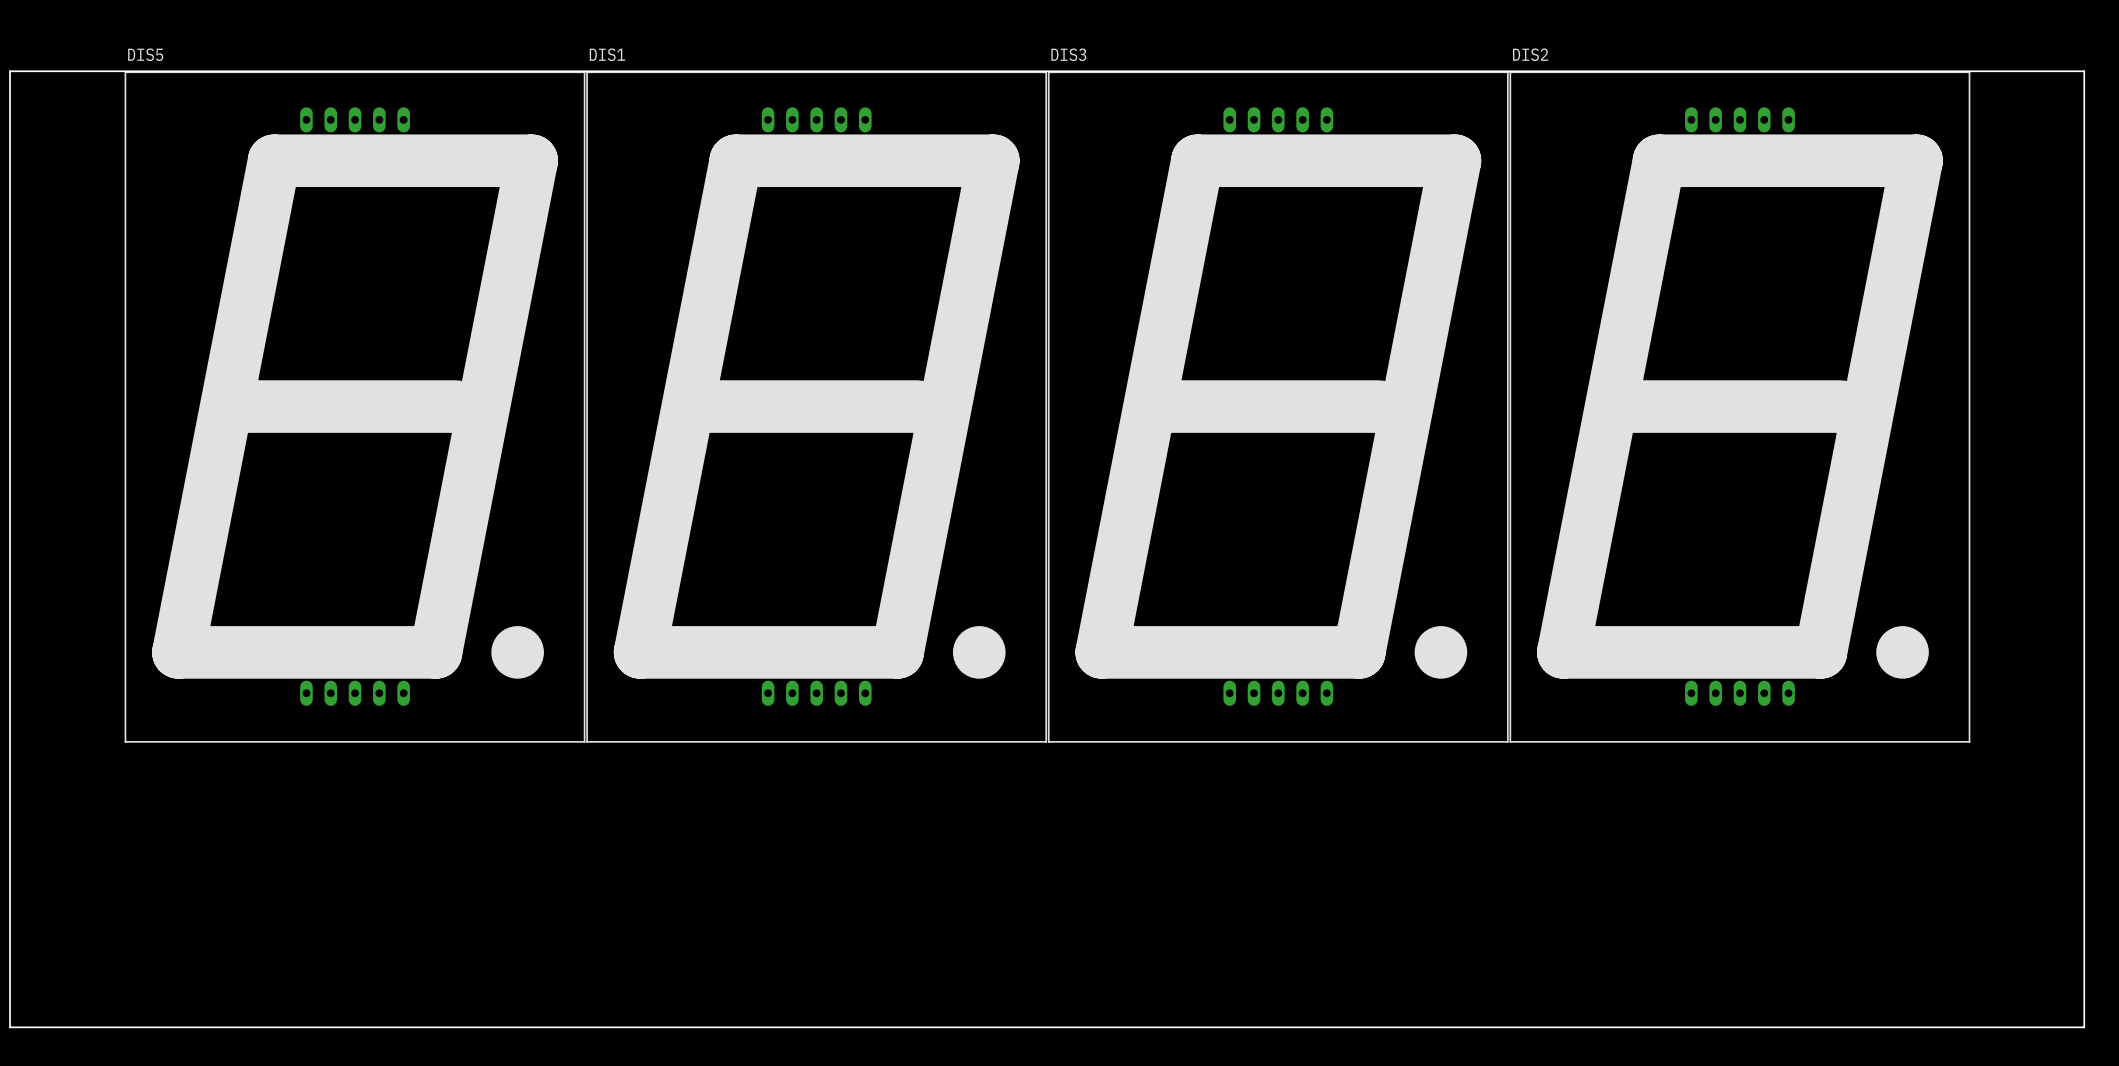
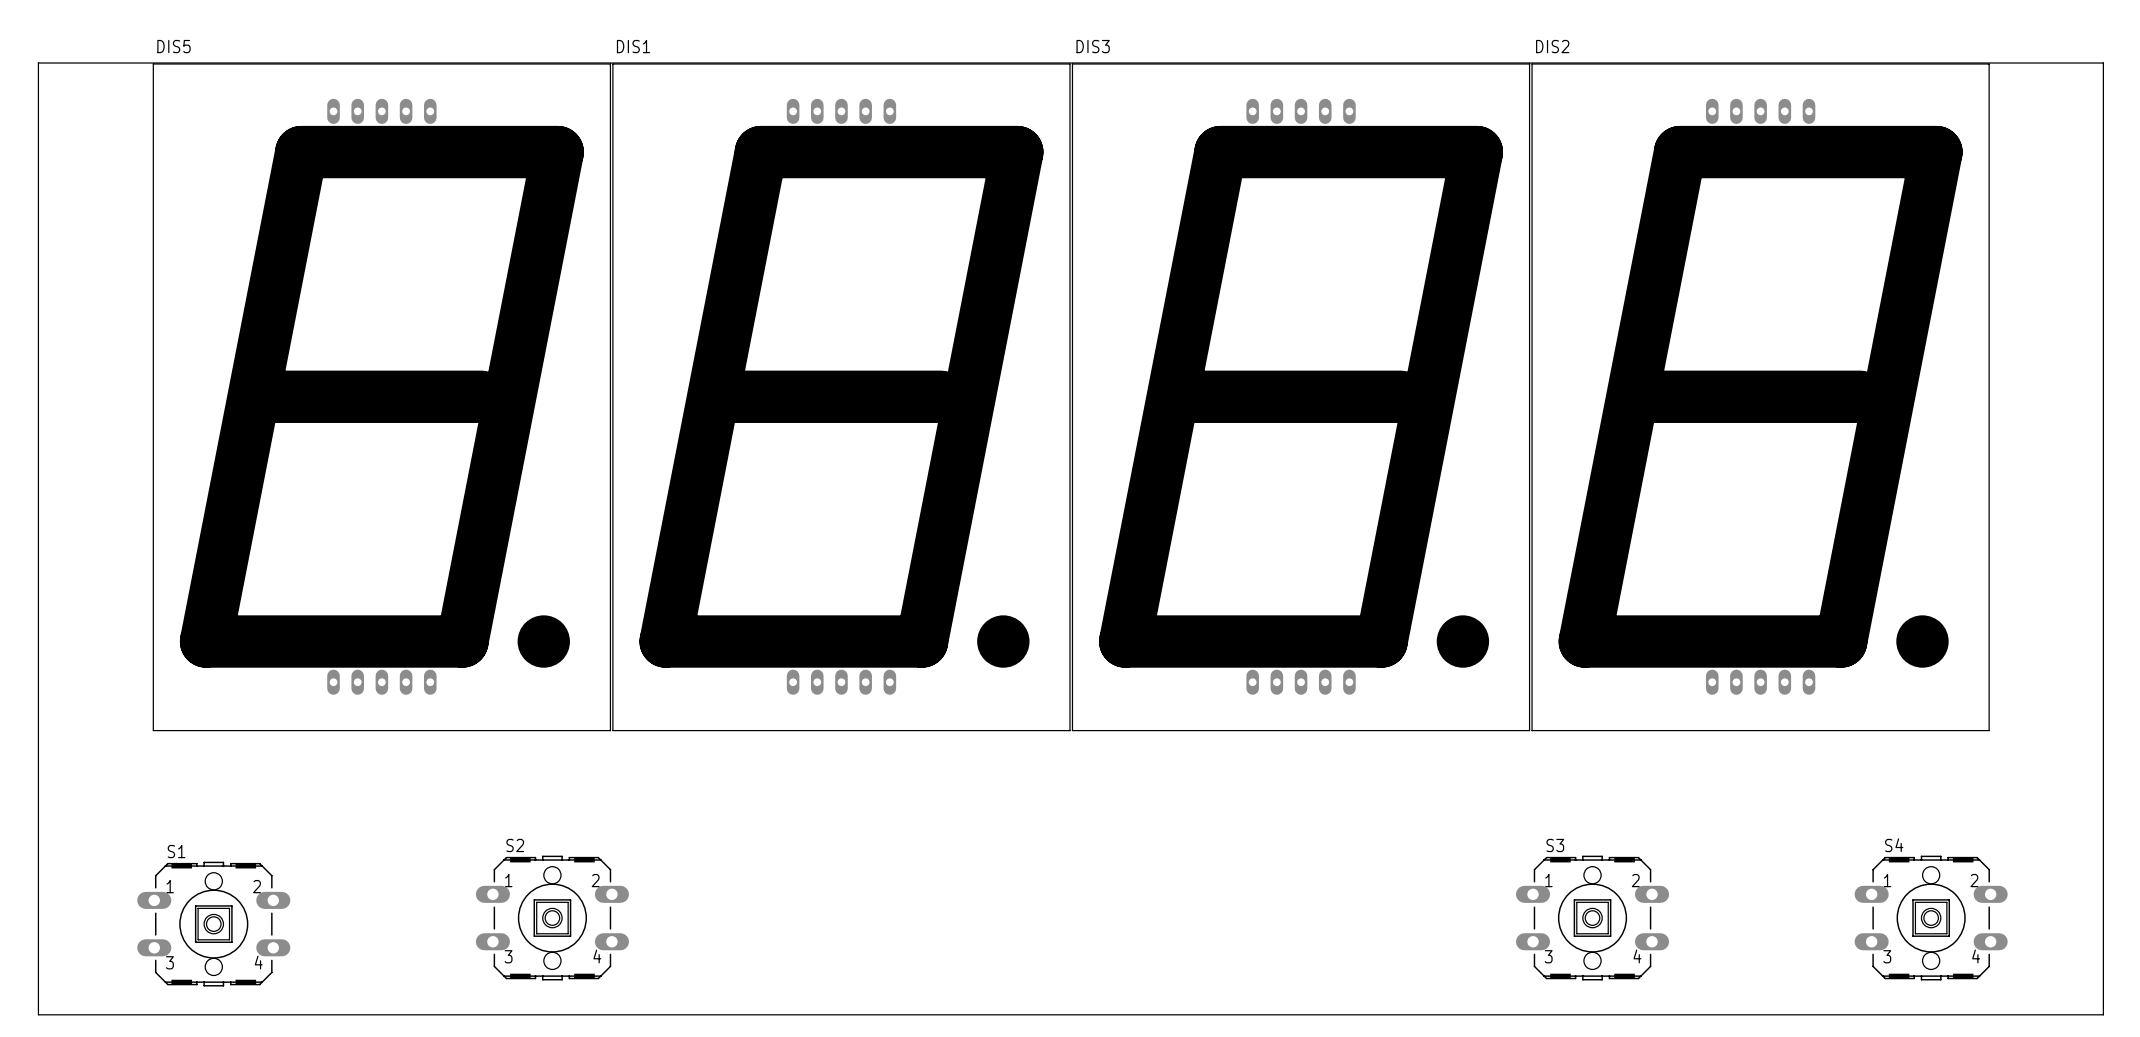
S2: none -> (552, 918)
S3: none -> (1592, 918)
S4: none -> (1931, 918)
S1: none -> (213, 924)

